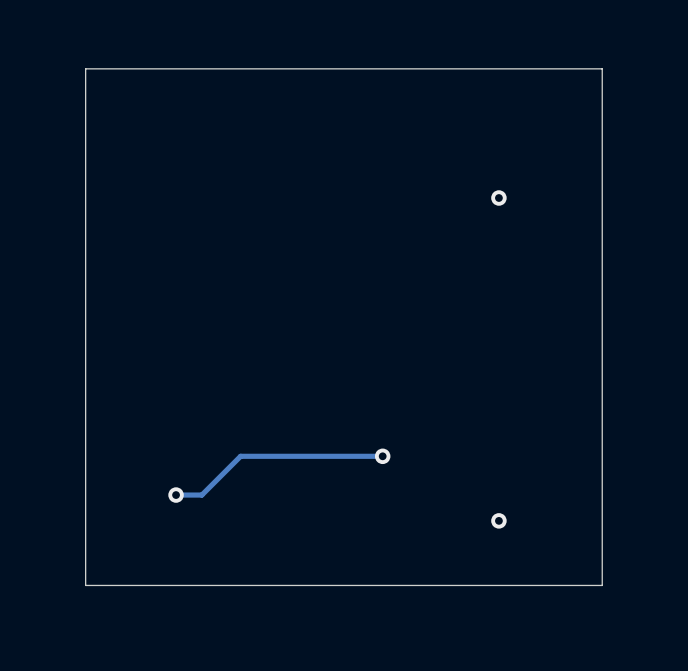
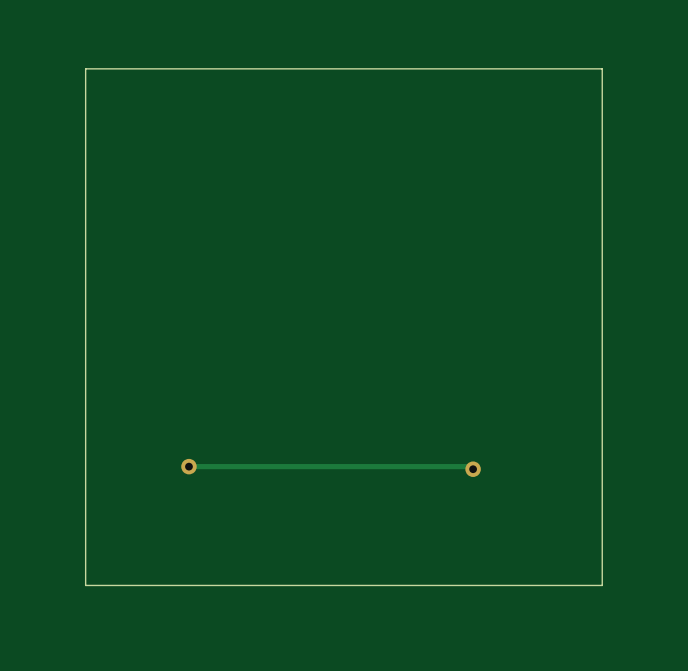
via: (498, 198) -> none
track: (382, 456) (240, 456) (201, 495) (176, 495) -> none
via: (382, 456) -> none
track: none -> (188, 466) (470, 466) (473, 469)
via: none -> (473, 469)
via position: (176, 495) -> (188, 466)
via: (498, 520) -> none

